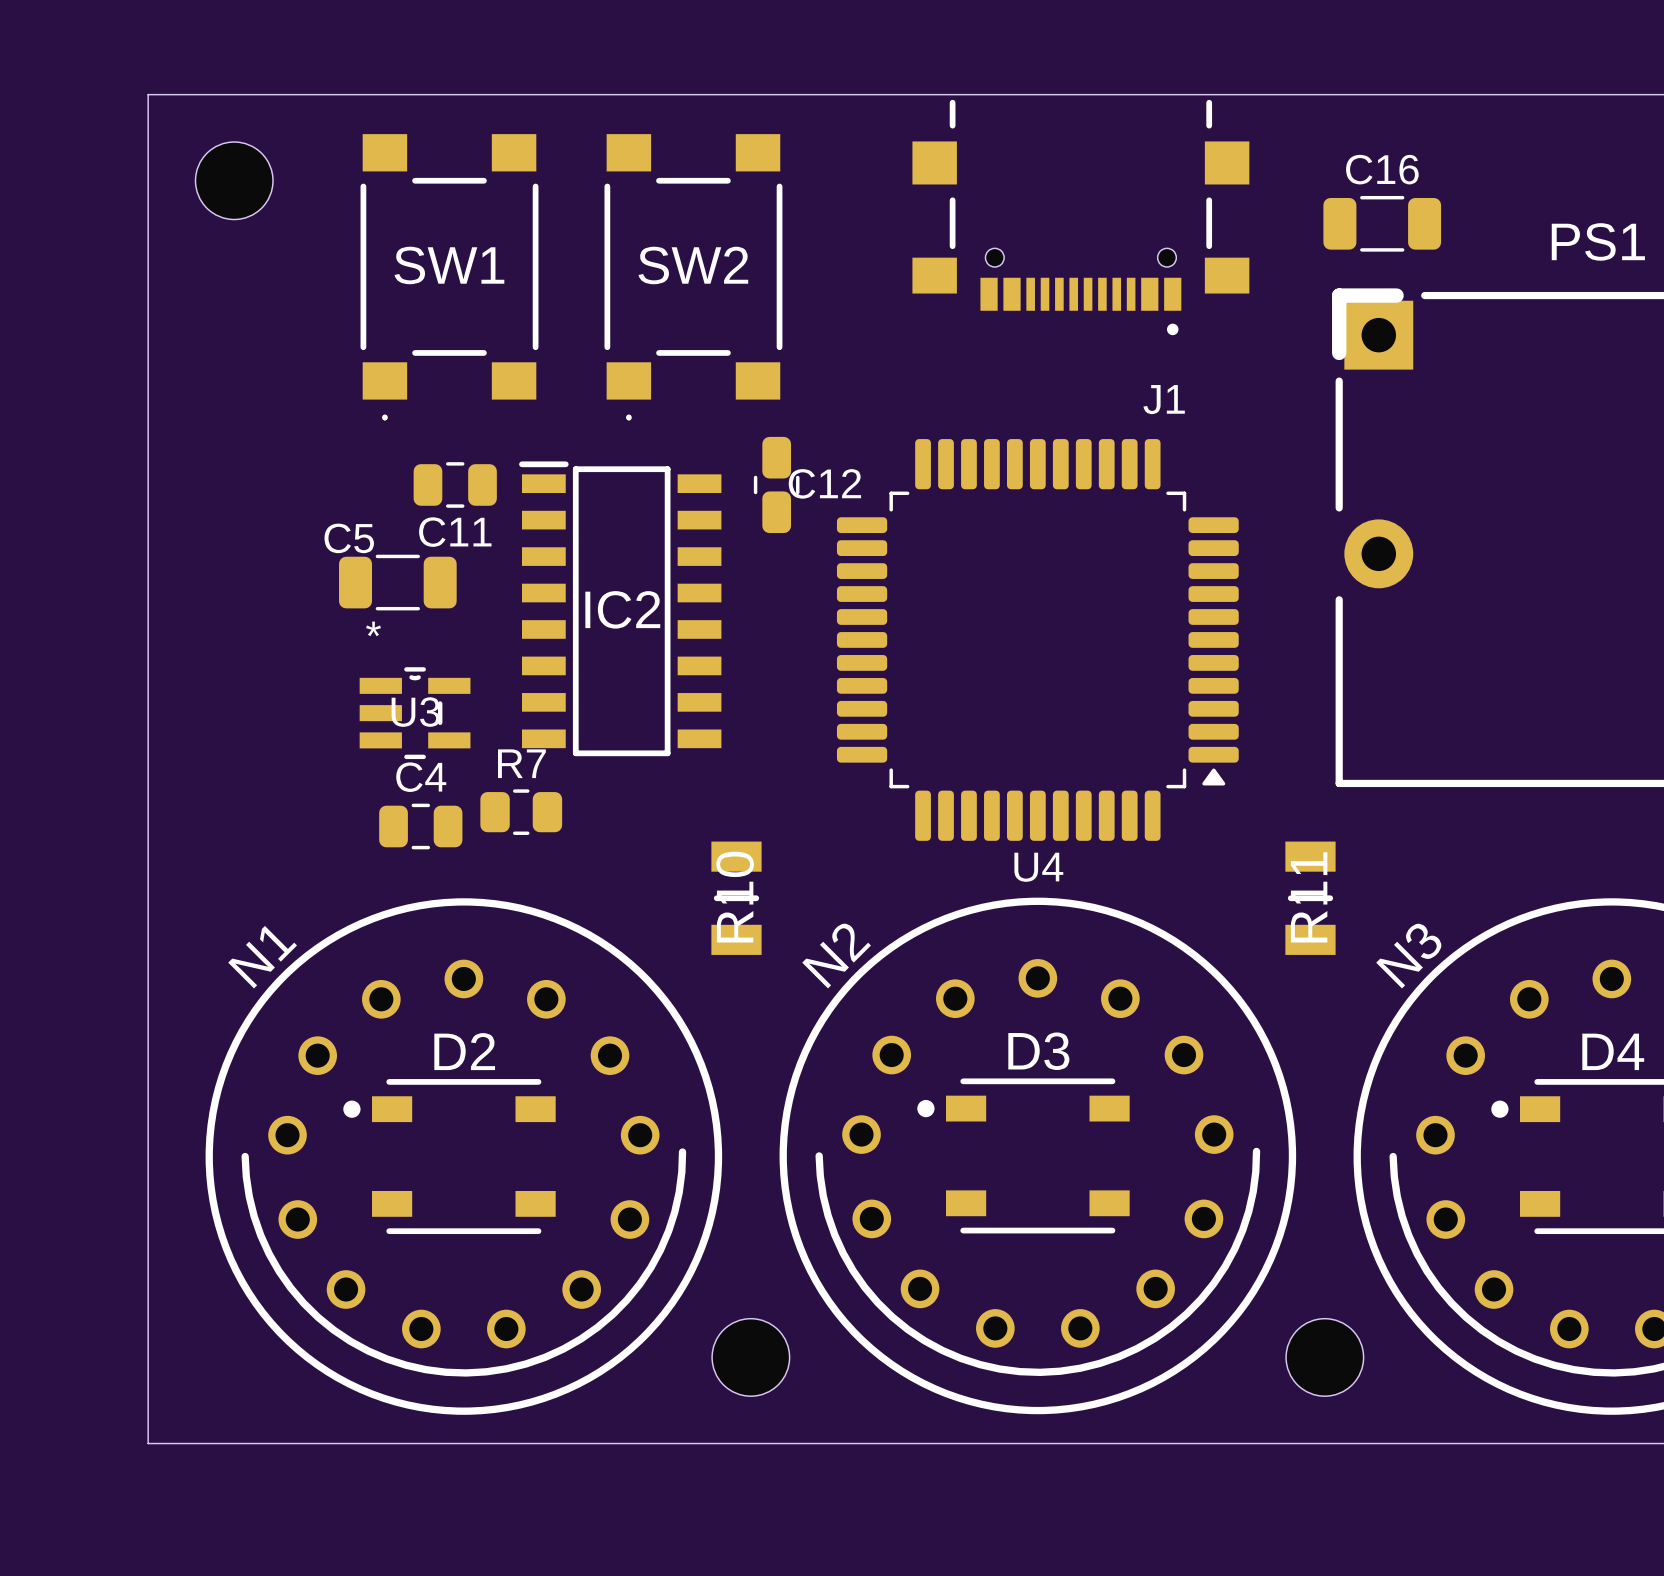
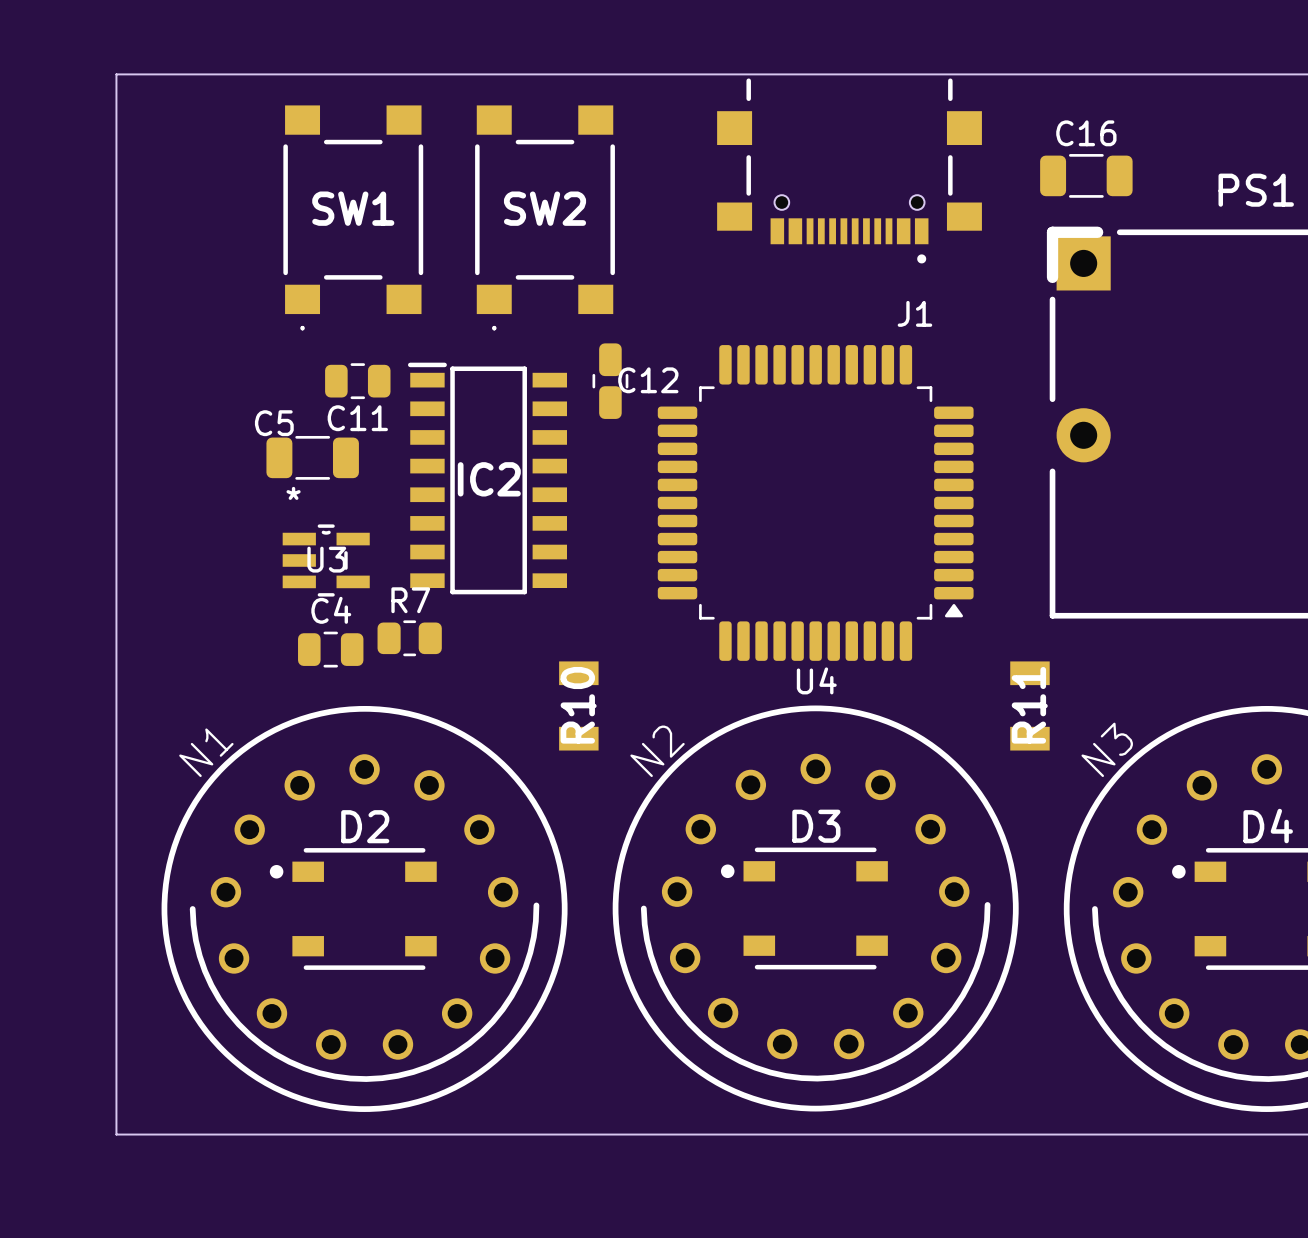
part: (234, 180) -> none
part: (750, 1357) -> none
part: (1324, 1357) -> none

